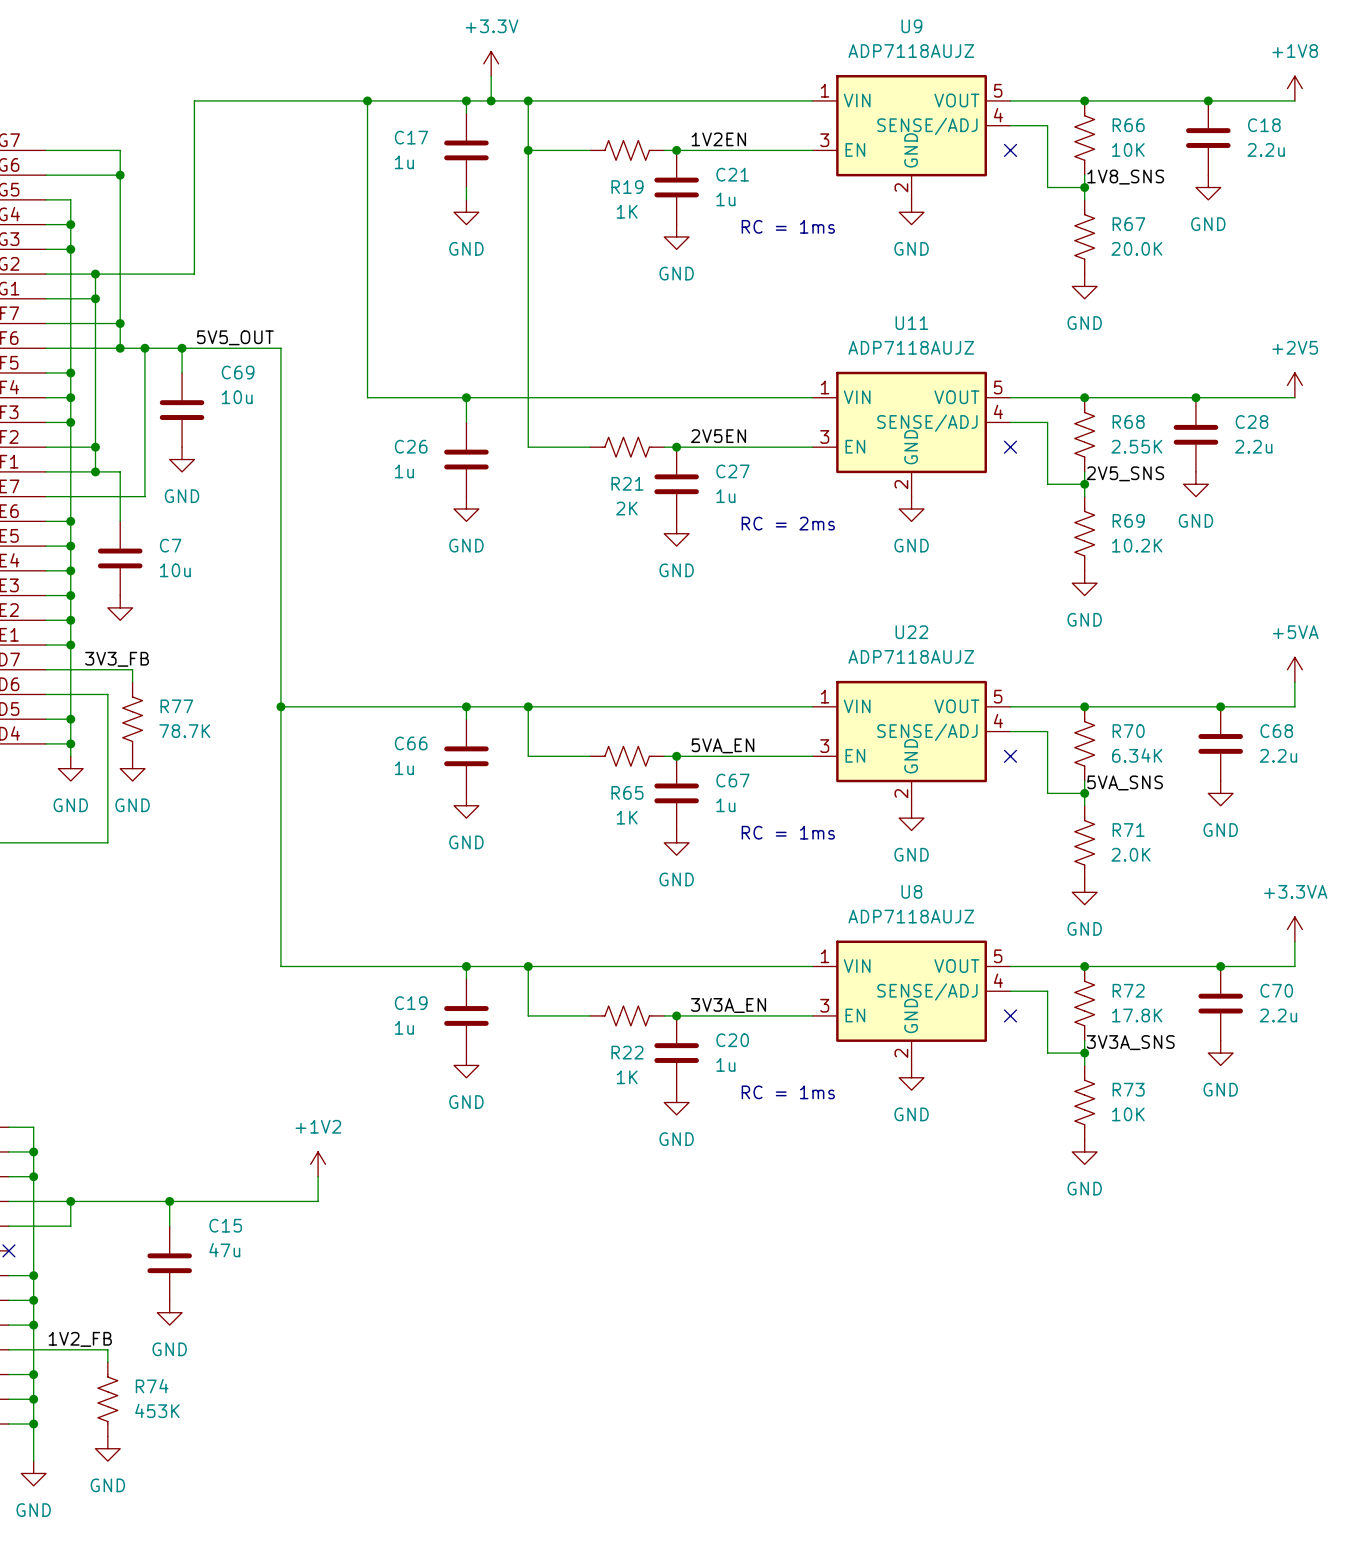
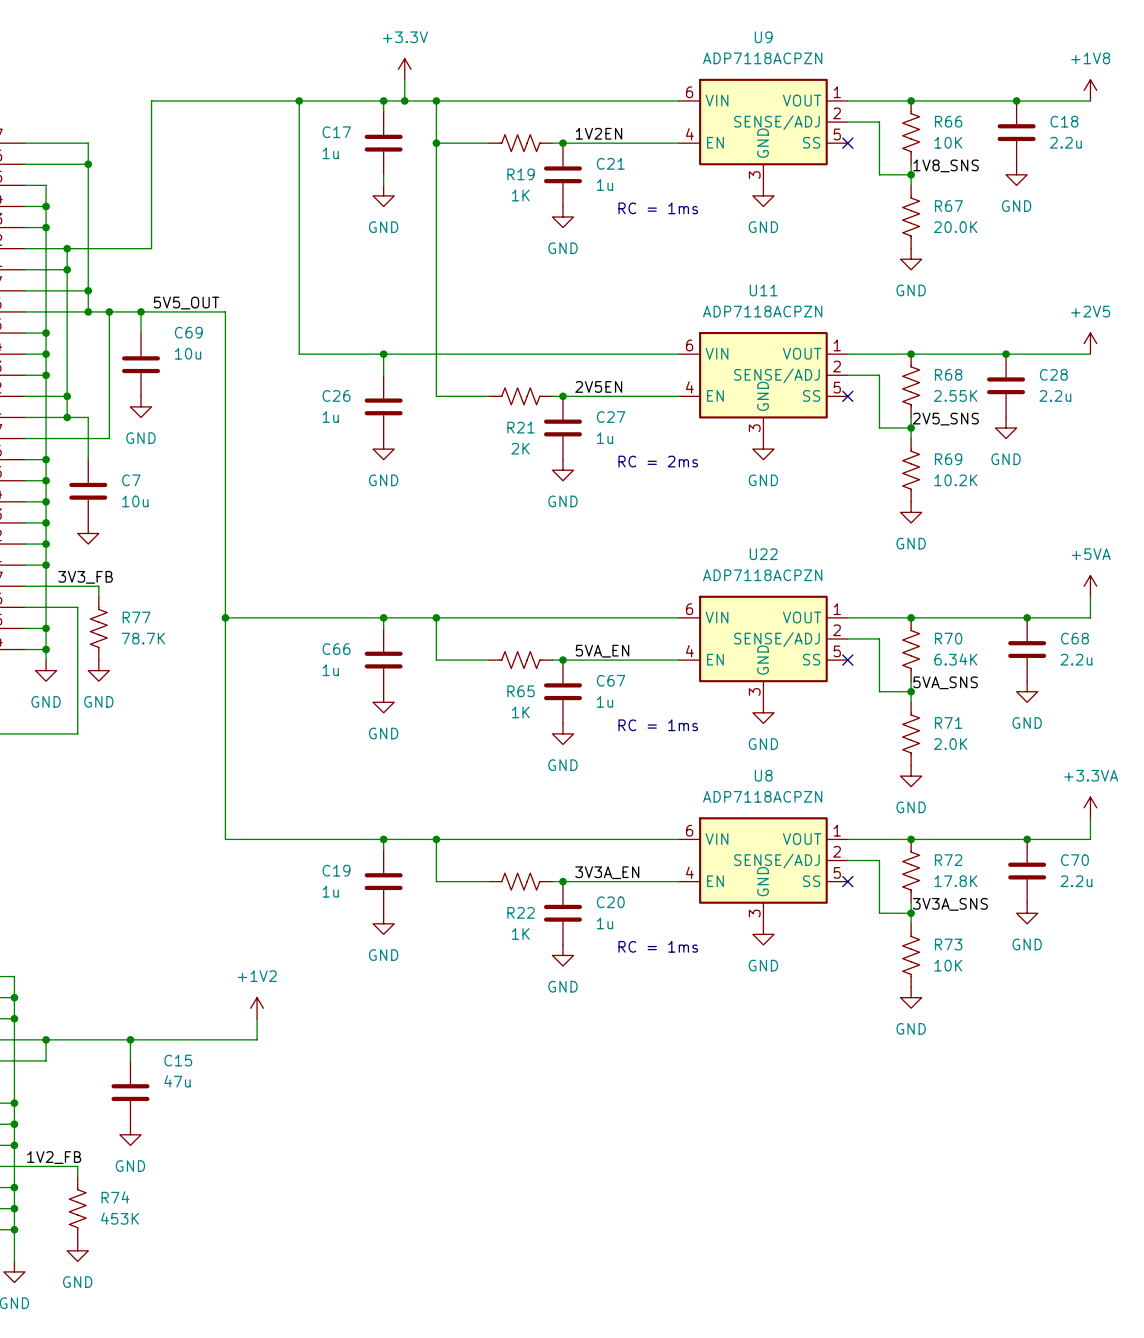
U9 value: ADP7118AUJZ (911, 51) -> ADP7118ACPZN (762, 58)
U9 symbol: [812, 74, 1011, 200] -> [679, 78, 848, 186]
U11 value: ADP7118AUJZ (911, 347) -> ADP7118ACPZN (762, 311)
U11 symbol: [812, 371, 1011, 497] -> [679, 332, 848, 439]
U22 value: ADP7118AUJZ (911, 656) -> ADP7118ACPZN (762, 575)
U22 symbol: [812, 680, 1011, 806] -> [679, 595, 848, 703]
U8 value: ADP7118AUJZ (911, 916) -> ADP7118ACPZN (762, 796)
U8 symbol: [812, 940, 1011, 1066] -> [679, 817, 848, 924]

